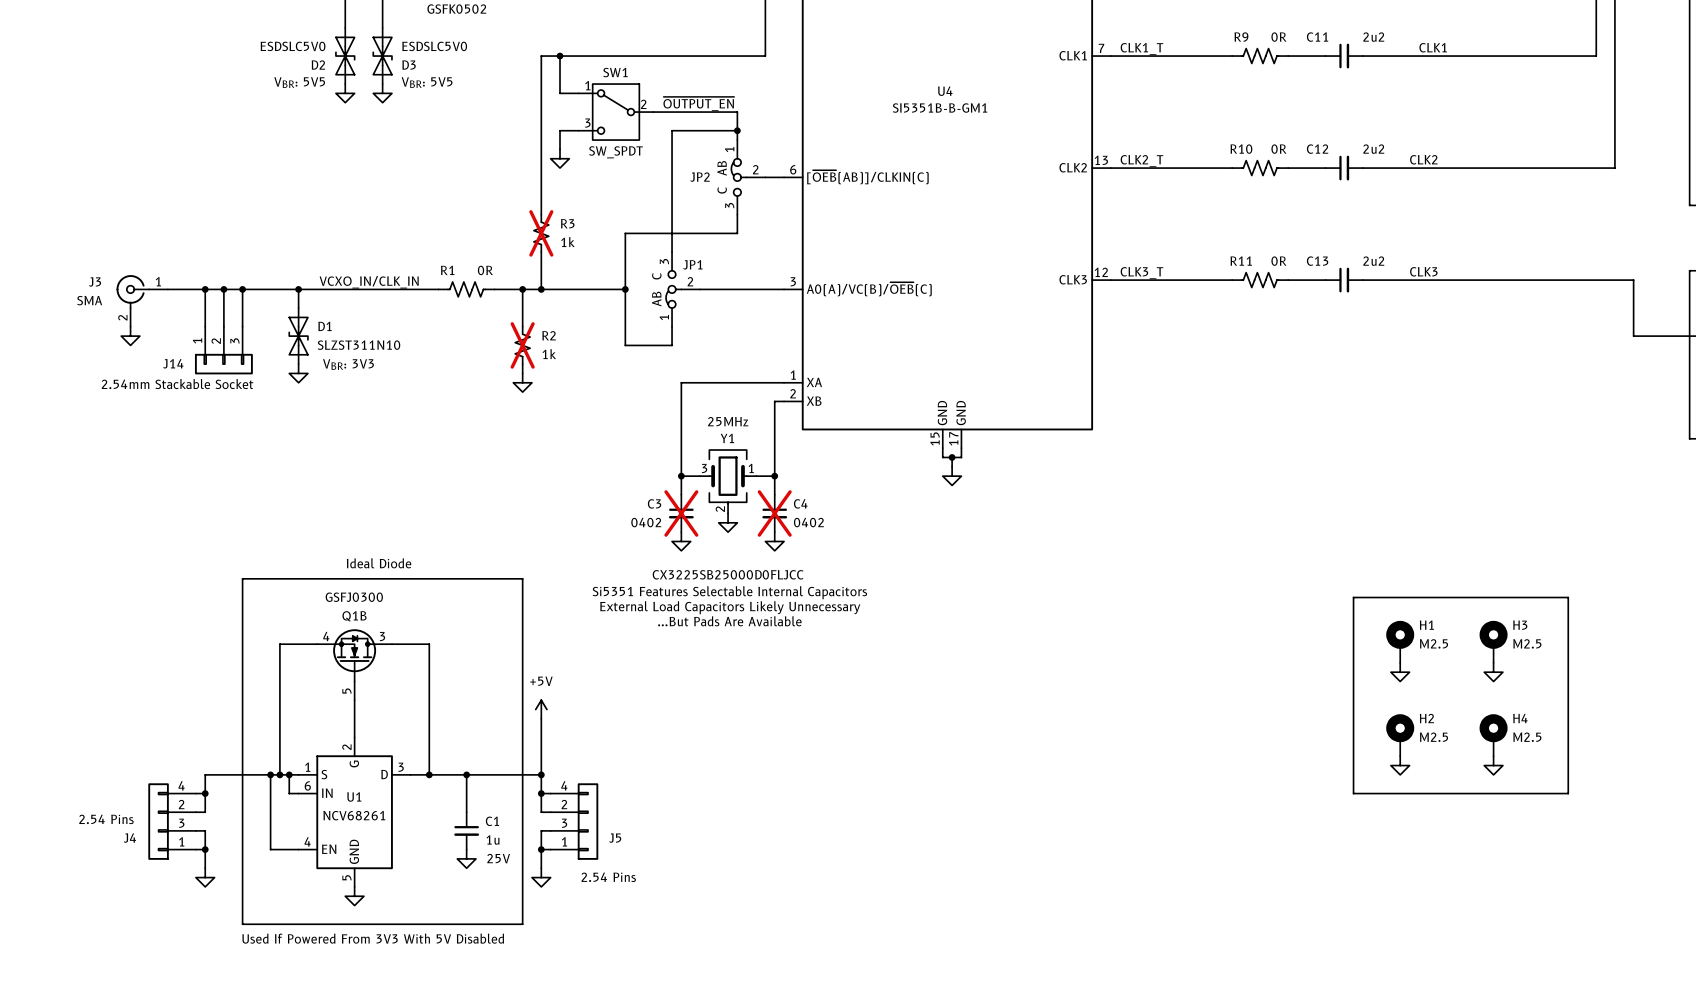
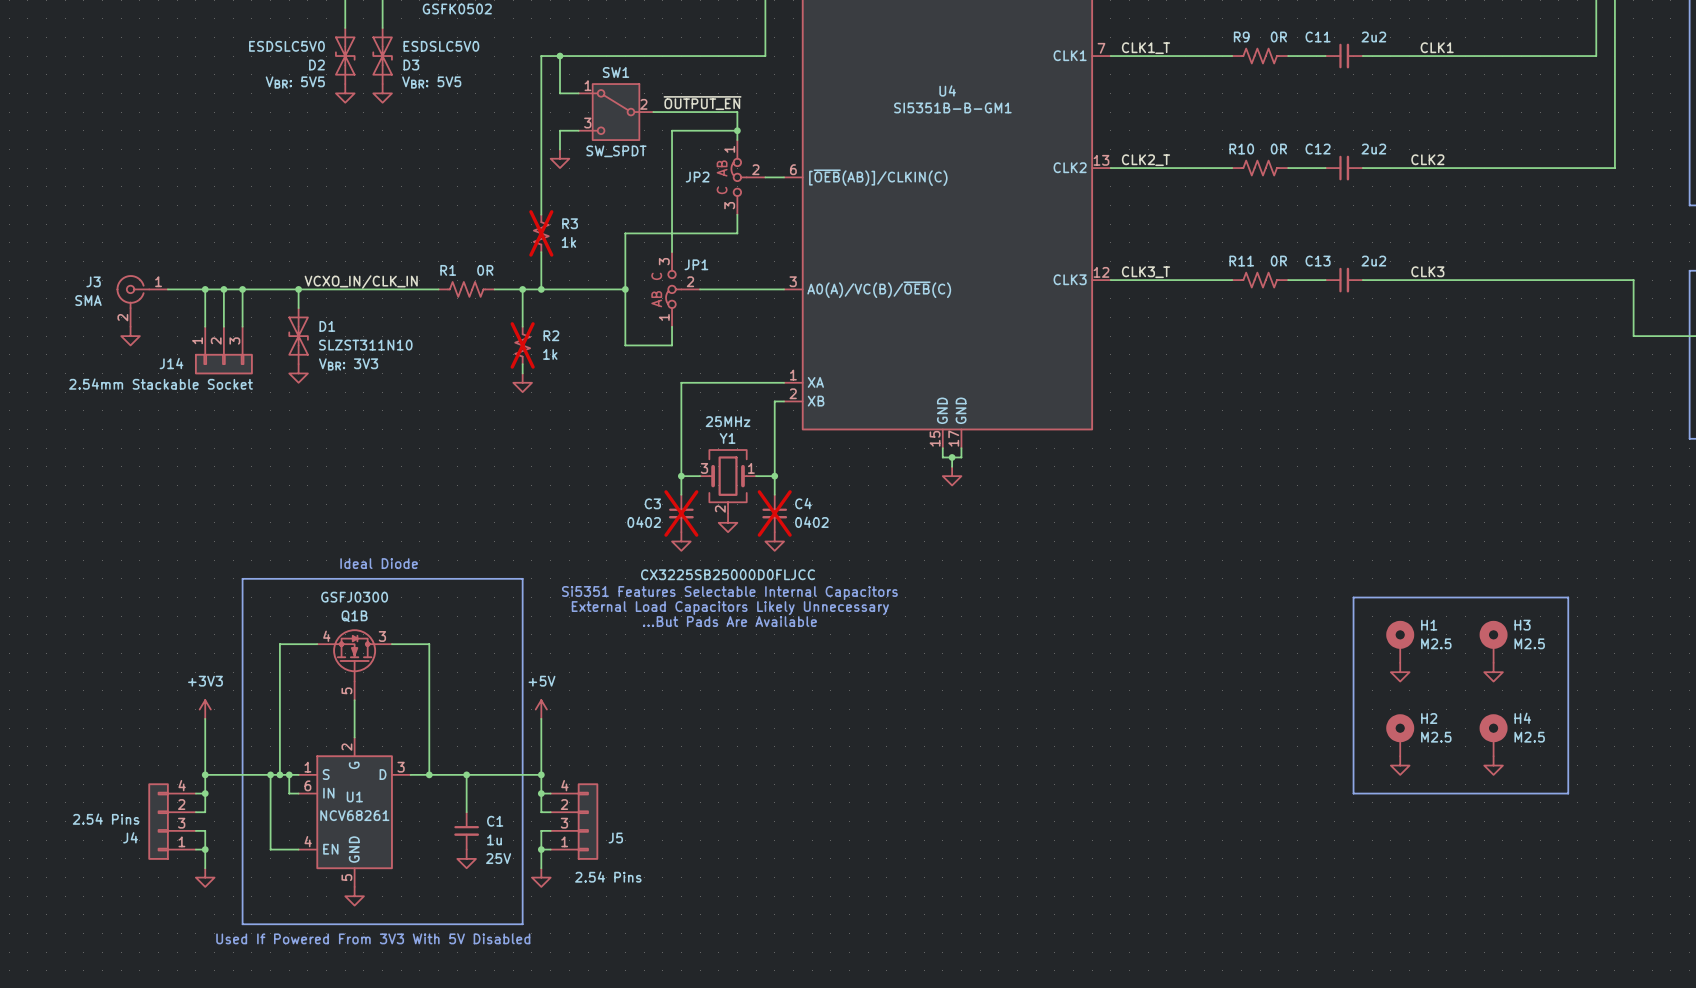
power symbol: none -> +3V3 (205, 709)
wire: none -> (205, 718) (205, 774)
junction: none -> (205, 774)

